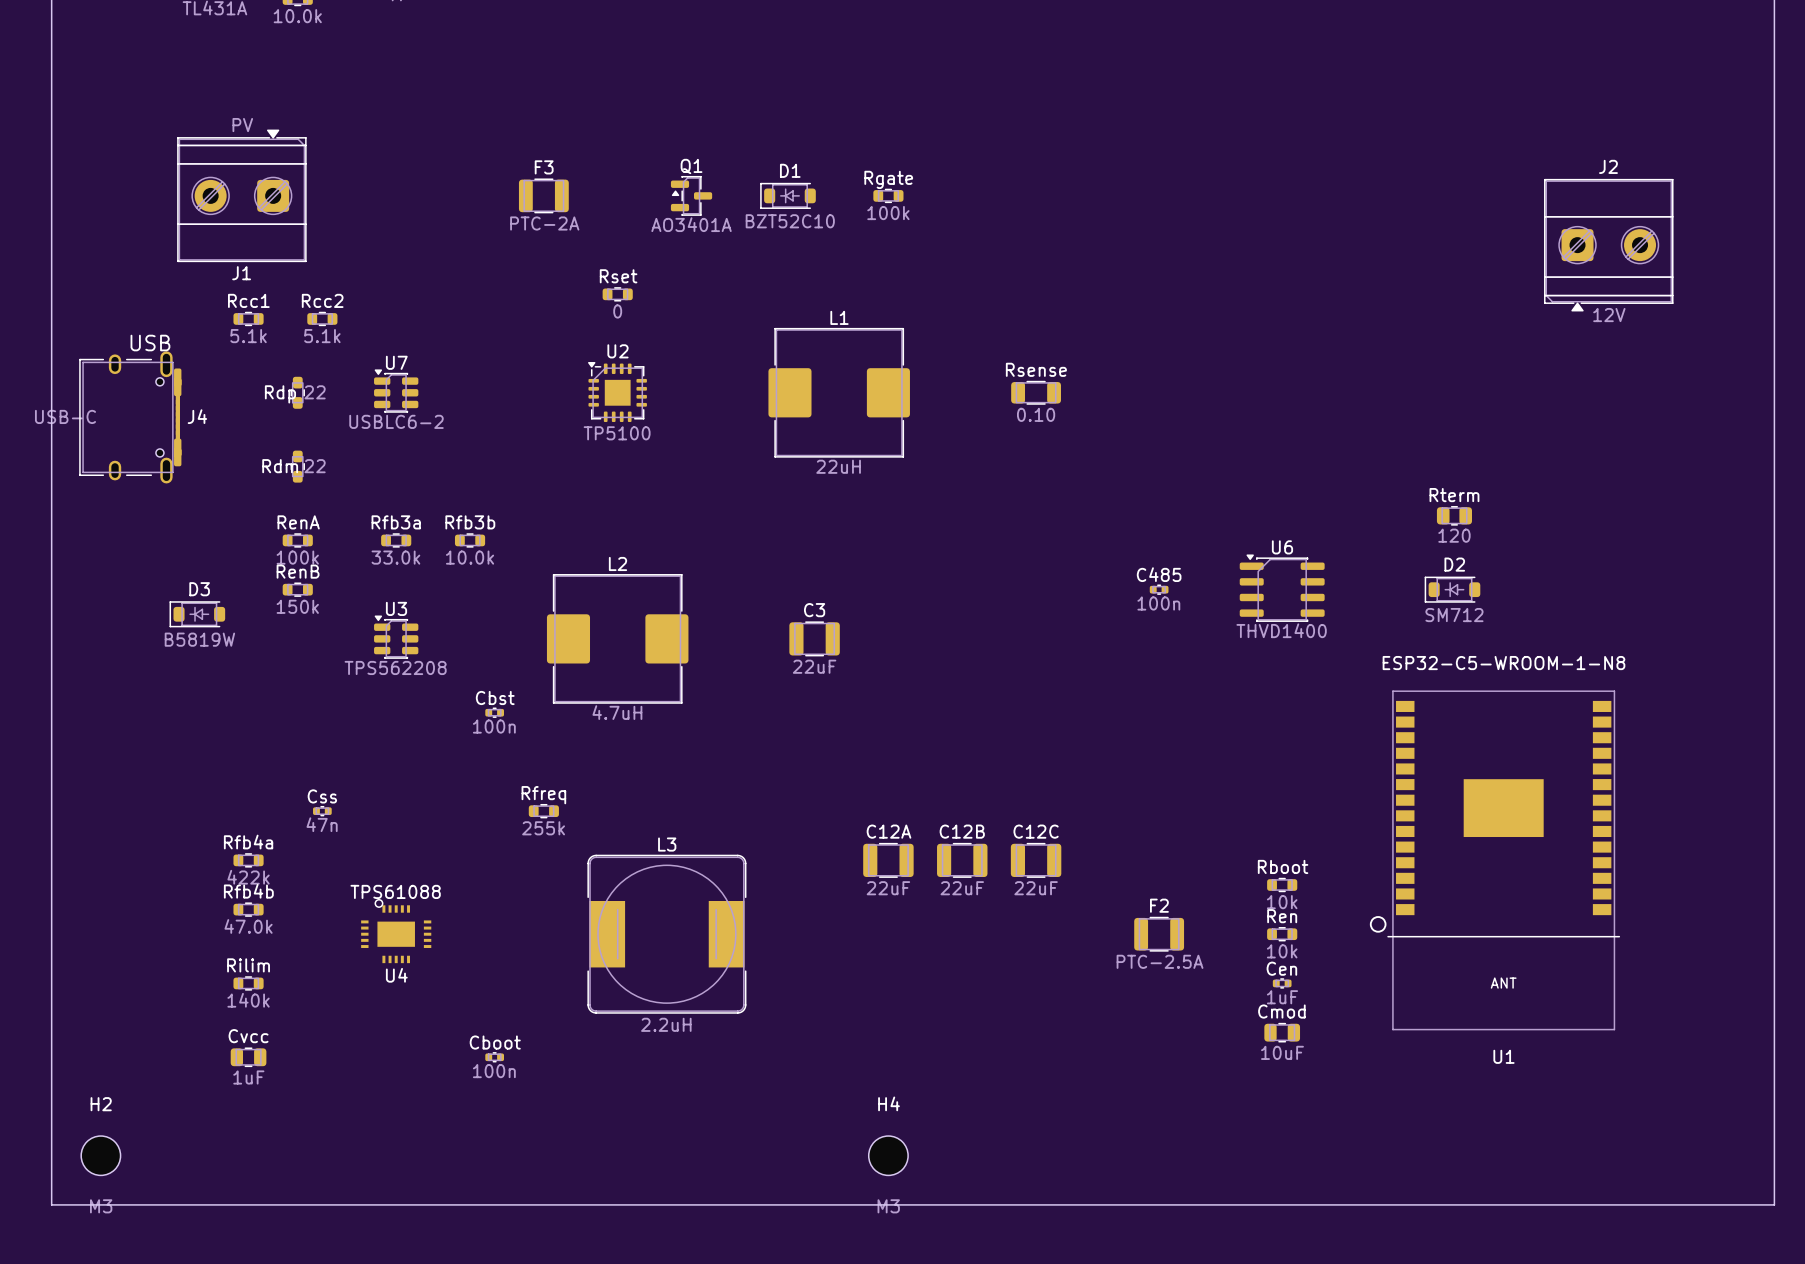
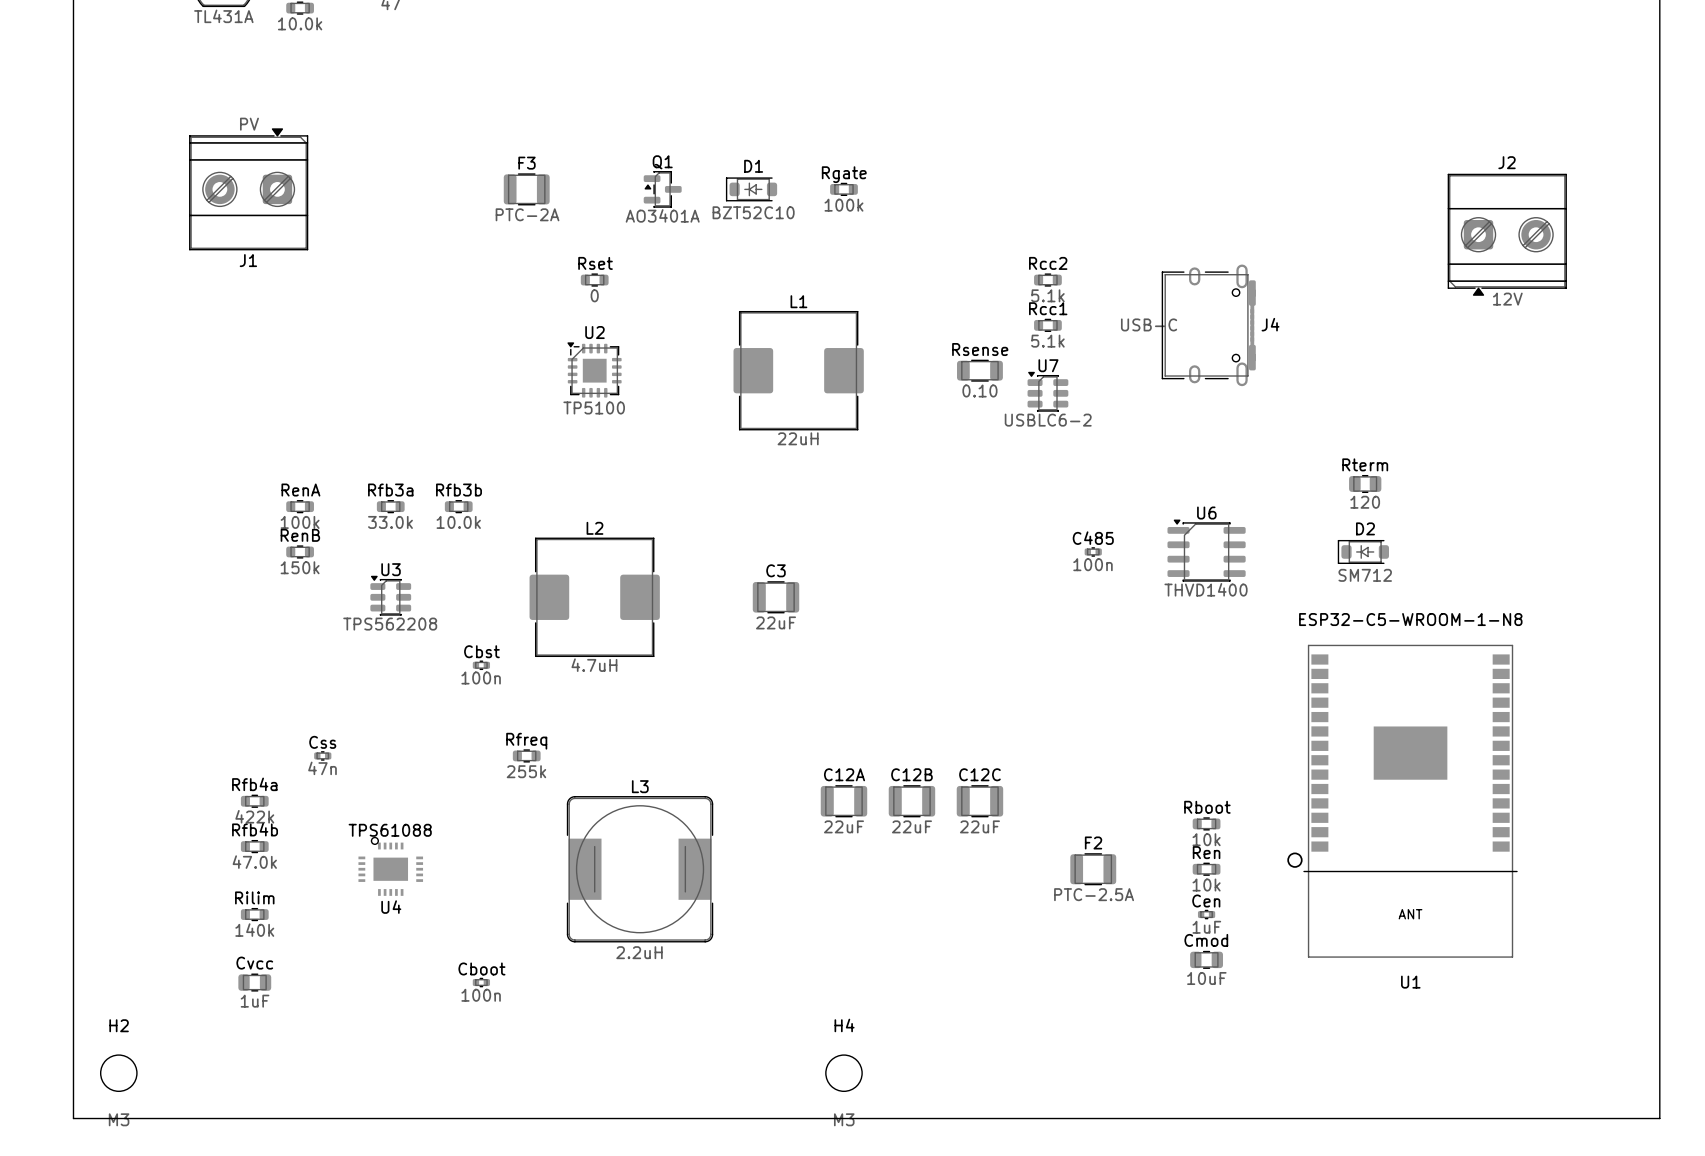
Rcc1 position: (248, 318) -> (1047, 325)
Rcc2 position: (322, 318) -> (1047, 280)
text: USB (150, 343) -> none
U7 position: (396, 391) -> (1047, 391)
Rdp: 22 (297, 392) -> none
J4 position: (130, 417) -> (1208, 325)
Rdm: 22 (297, 466) -> none
D3: B5819W (197, 614) -> none

